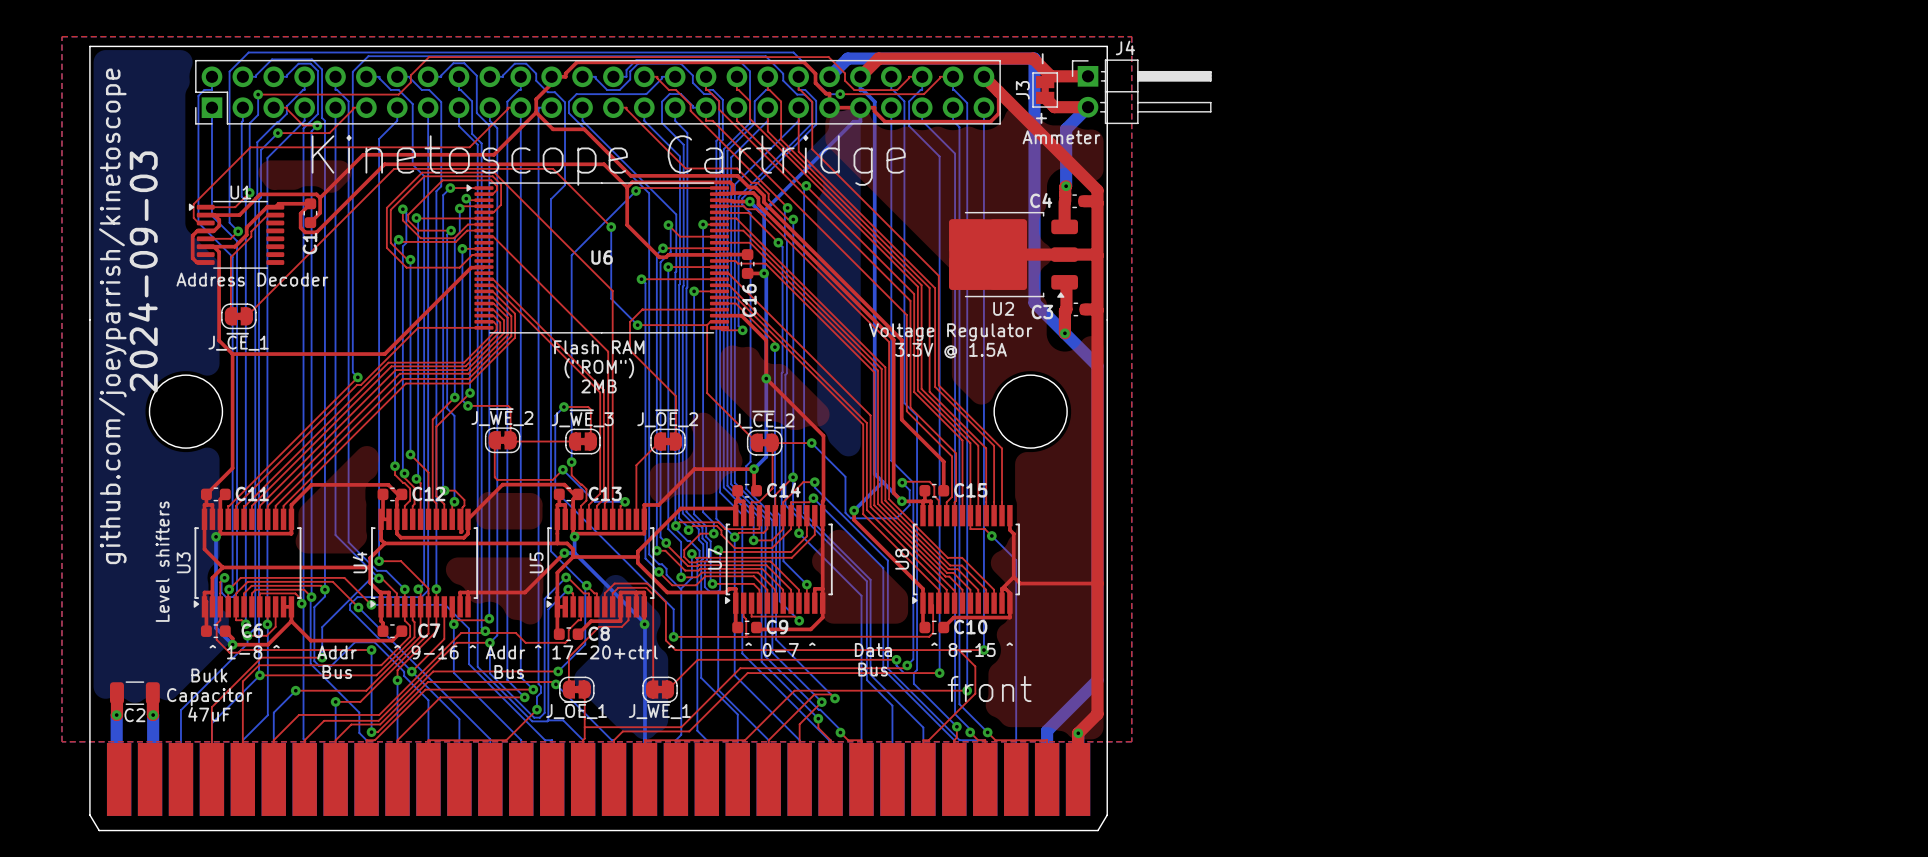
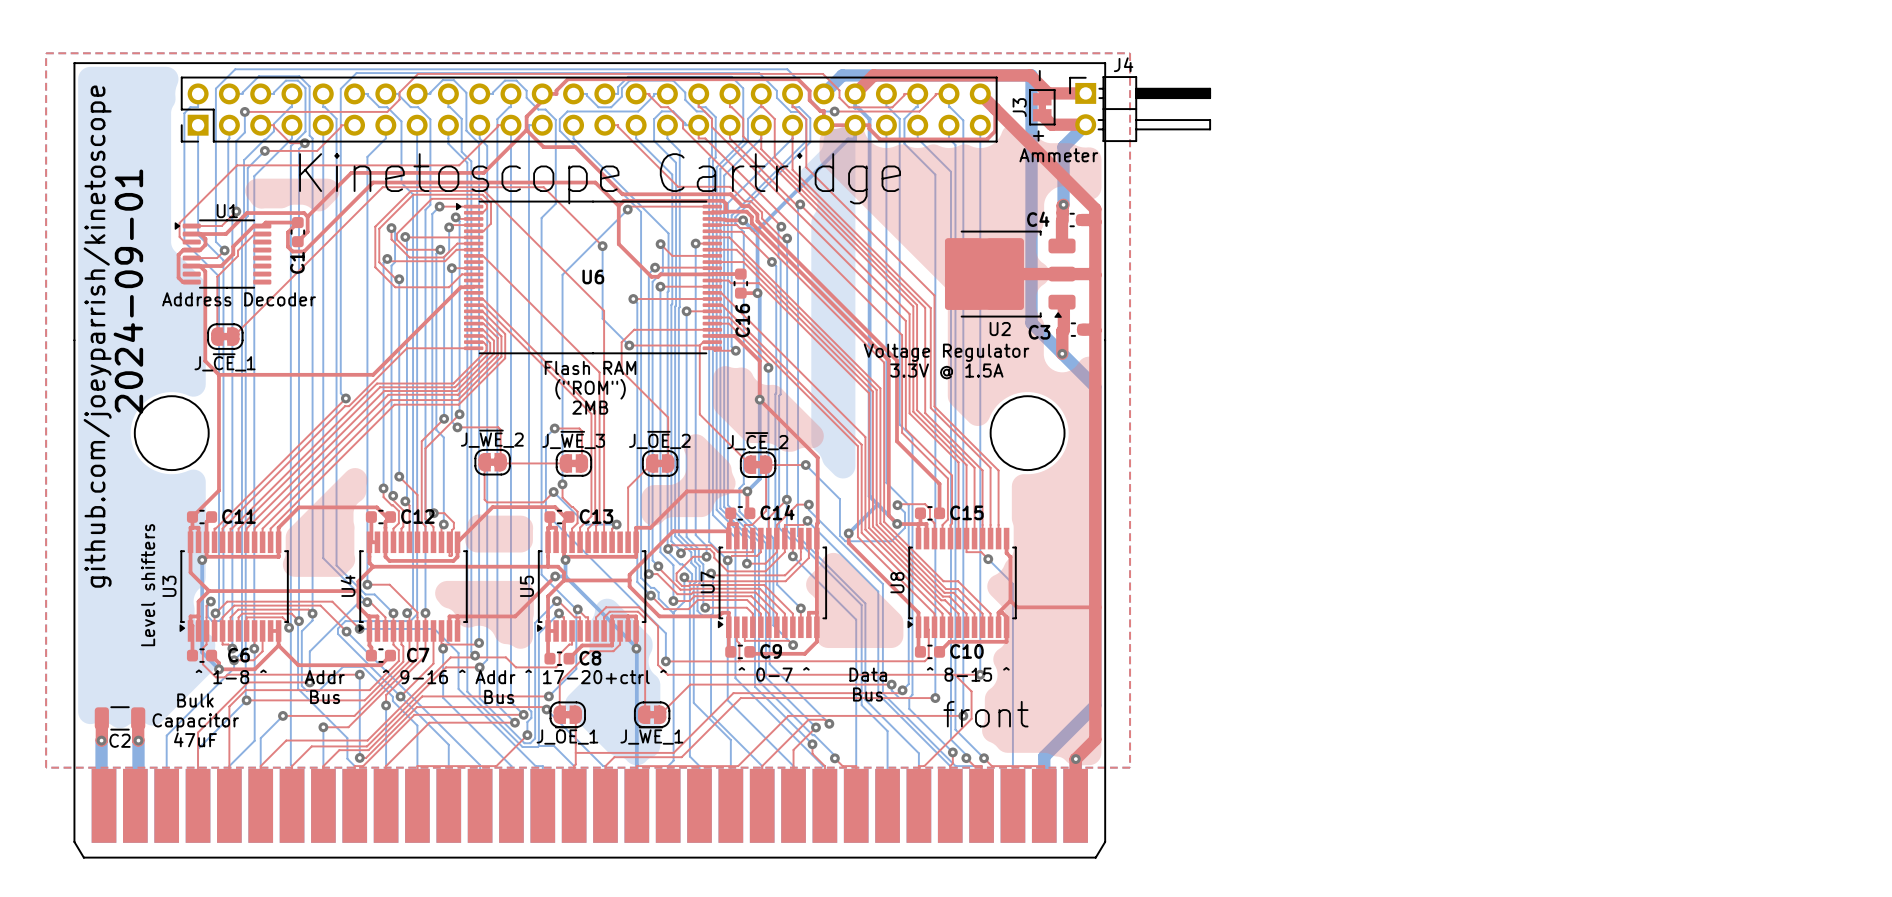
text: 2024-09-03 (143, 271) -> 2024-09-01 (128, 291)

